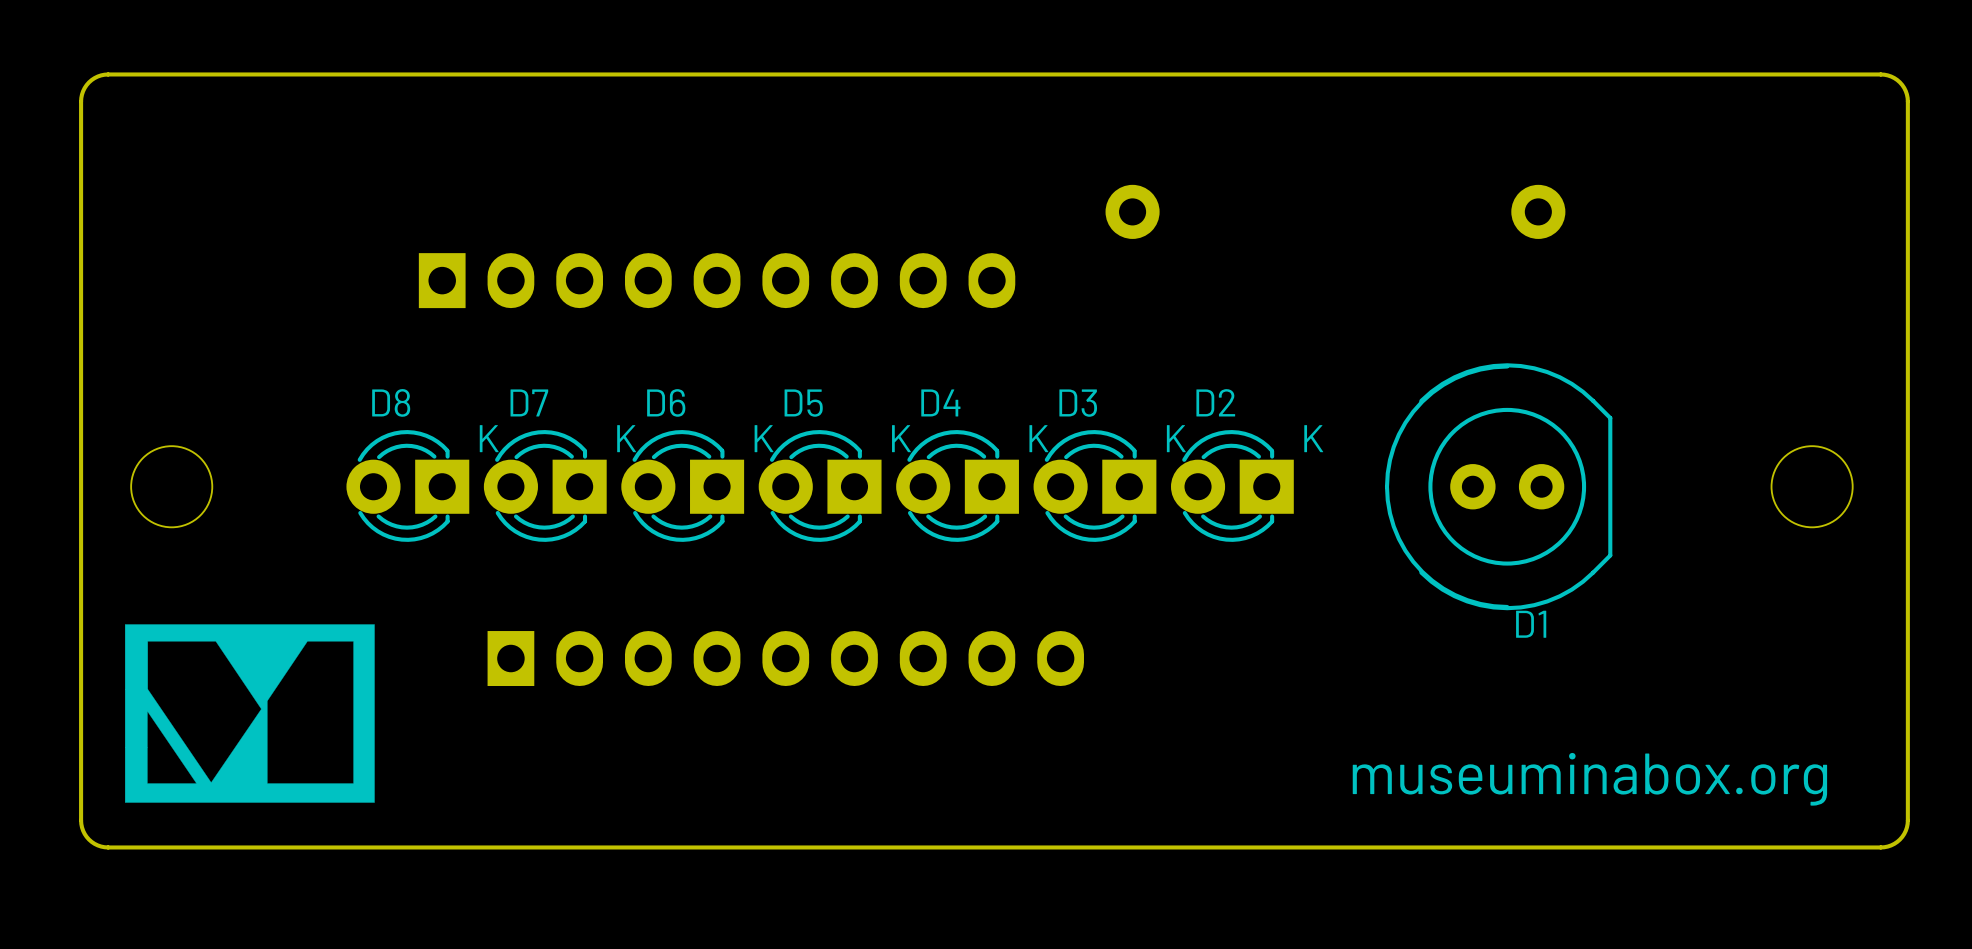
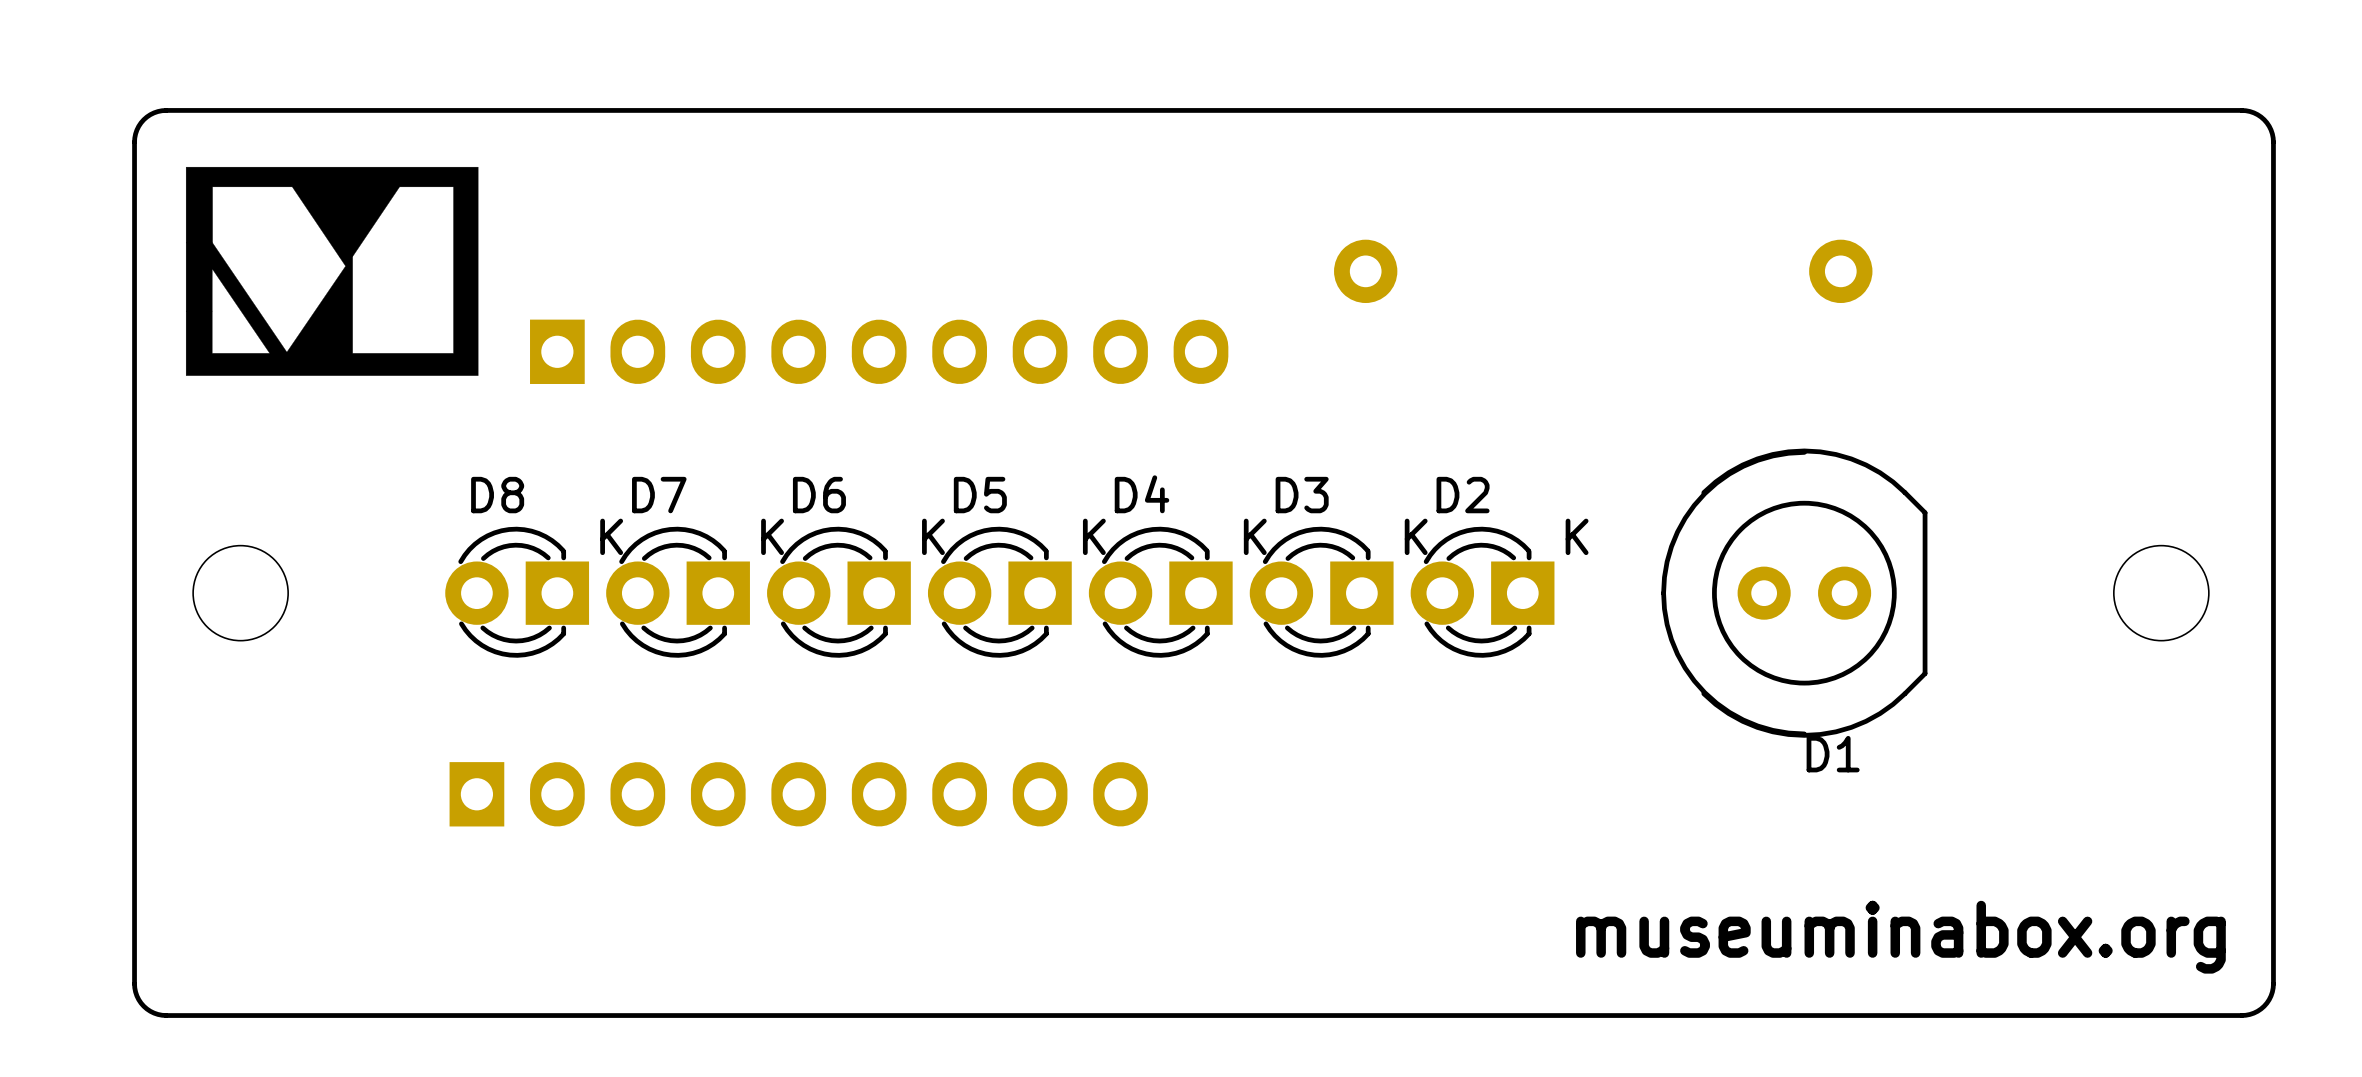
part position: (785, 658) -> (798, 794)
drawing position: (249, 713) -> (332, 271)

